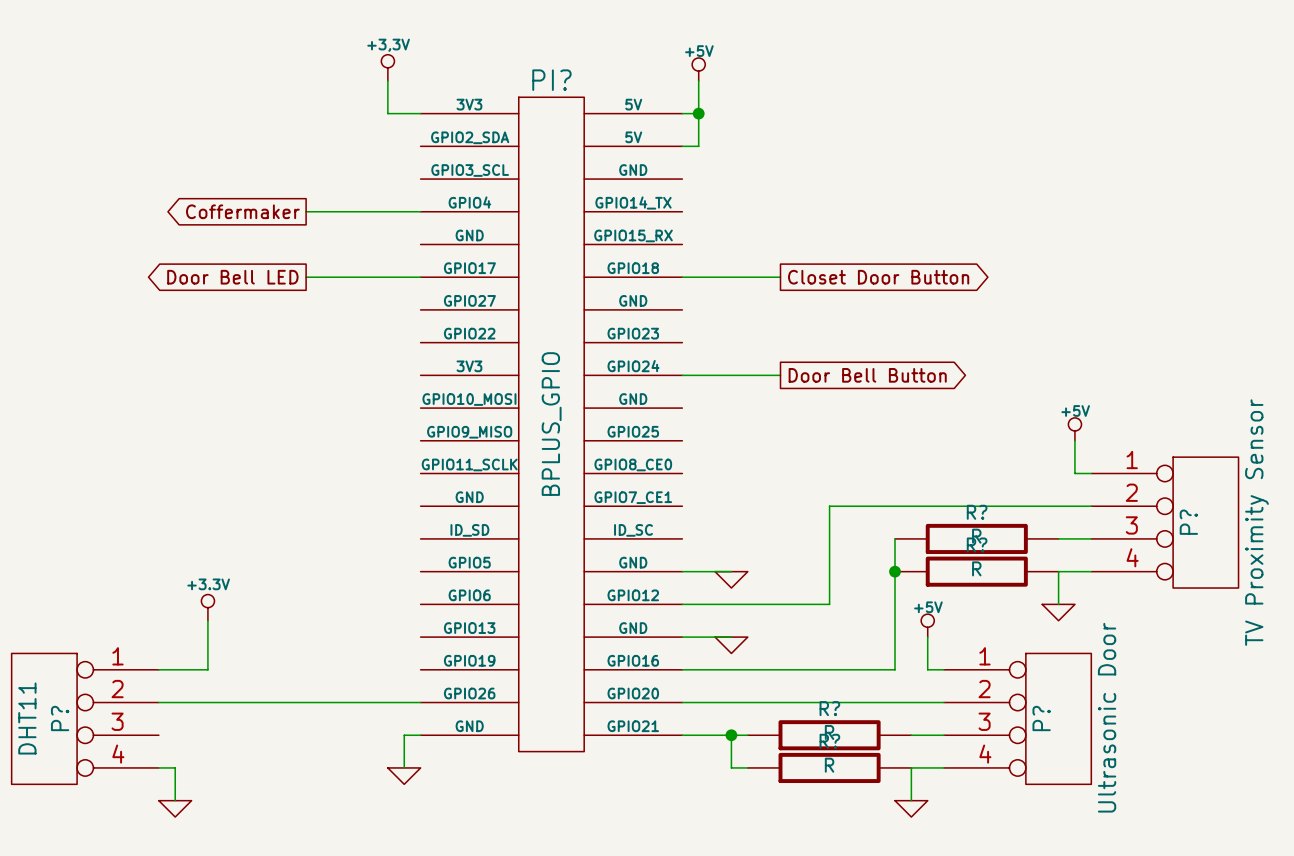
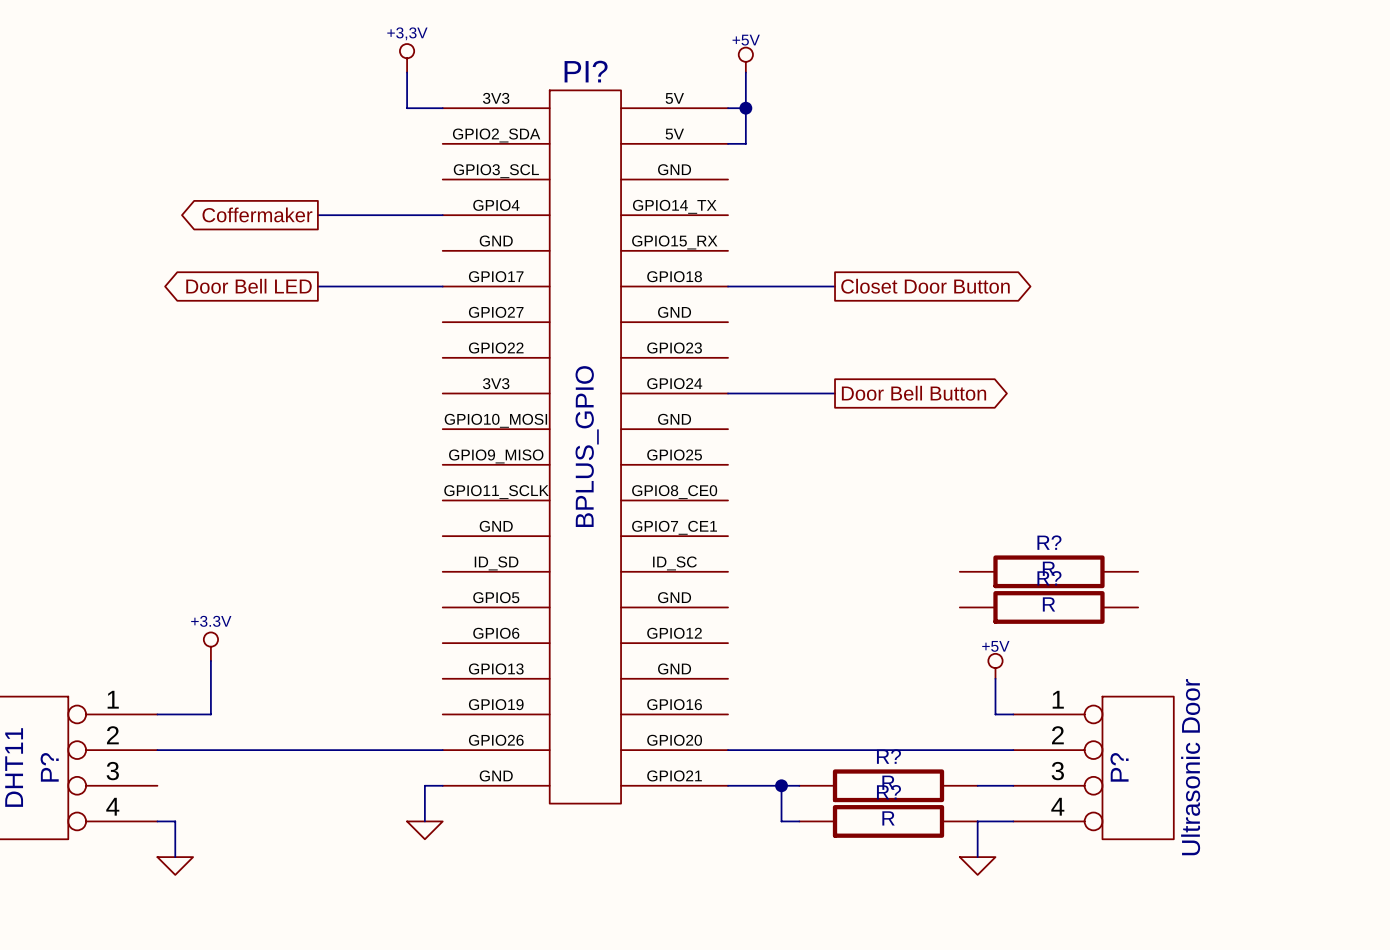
power symbol: +5V (1074, 429) -> none
wire: (1074, 440) (1074, 473) (1091, 473) -> none
wire: (1091, 506) (829, 506) (829, 604) (682, 604) -> none
P?: TV Proximity Sensor (1164, 522) -> none
wire: (895, 538) (895, 669) (682, 669) -> none
wire: (1058, 538) (1091, 538) -> none
wire: (682, 571) (731, 571) -> none
junction: (895, 571) -> none
wire: (1091, 571) (1058, 571) (1058, 604) -> none
power symbol: (731, 579) -> none
power symbol: (1058, 612) -> none
wire: (682, 637) (731, 637) -> none
power symbol: (731, 645) -> none

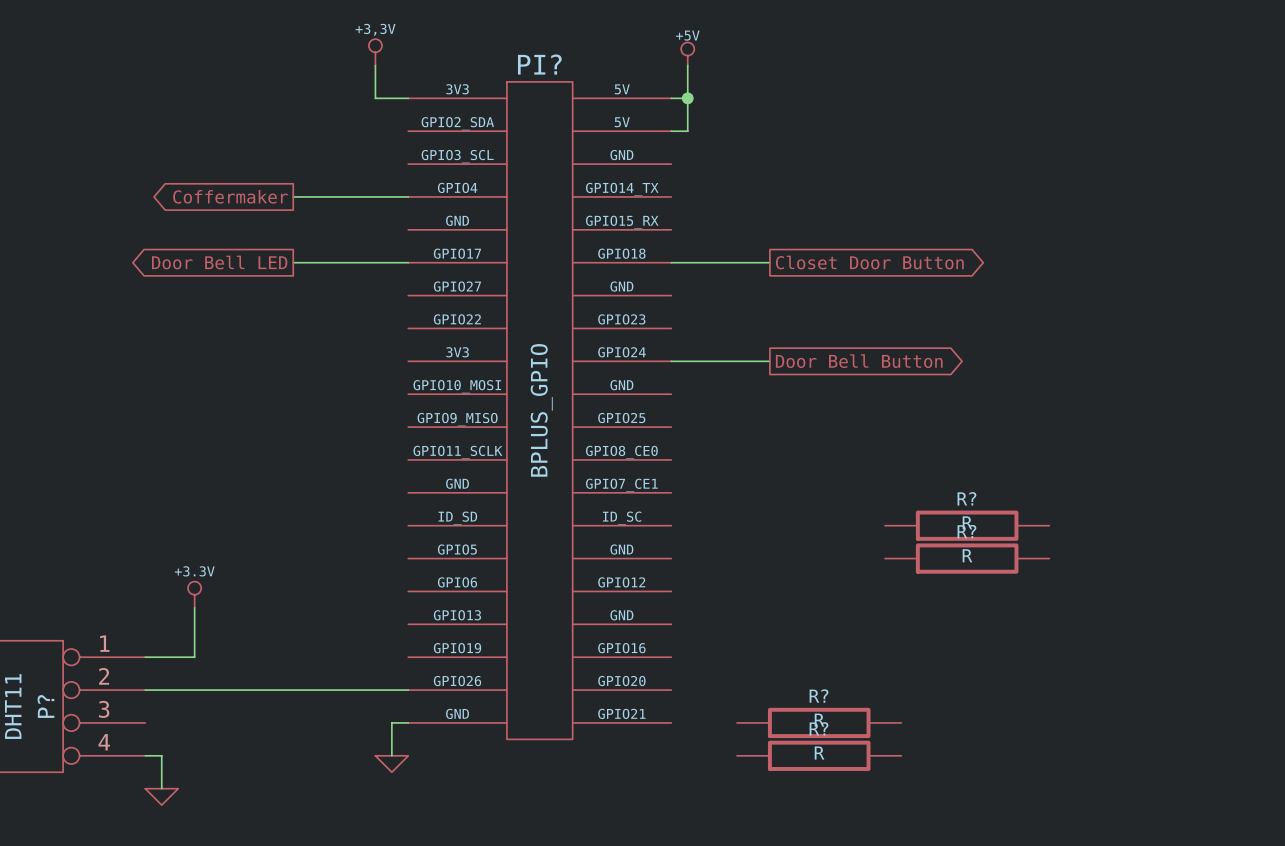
power symbol: +5V (995, 666) -> none
wire: (995, 678) (995, 714) (1013, 714) -> none
wire: (728, 750) (1013, 750) -> none
P?: Ultrasonic Door (1093, 767) -> none
wire: (728, 785) (799, 785) -> none
wire: (781, 785) (781, 821) (799, 821) -> none
junction: (781, 785) -> none
wire: (977, 785) (1013, 785) -> none
wire: (1013, 821) (977, 821) (977, 857) -> none
power symbol: (977, 866) -> none

